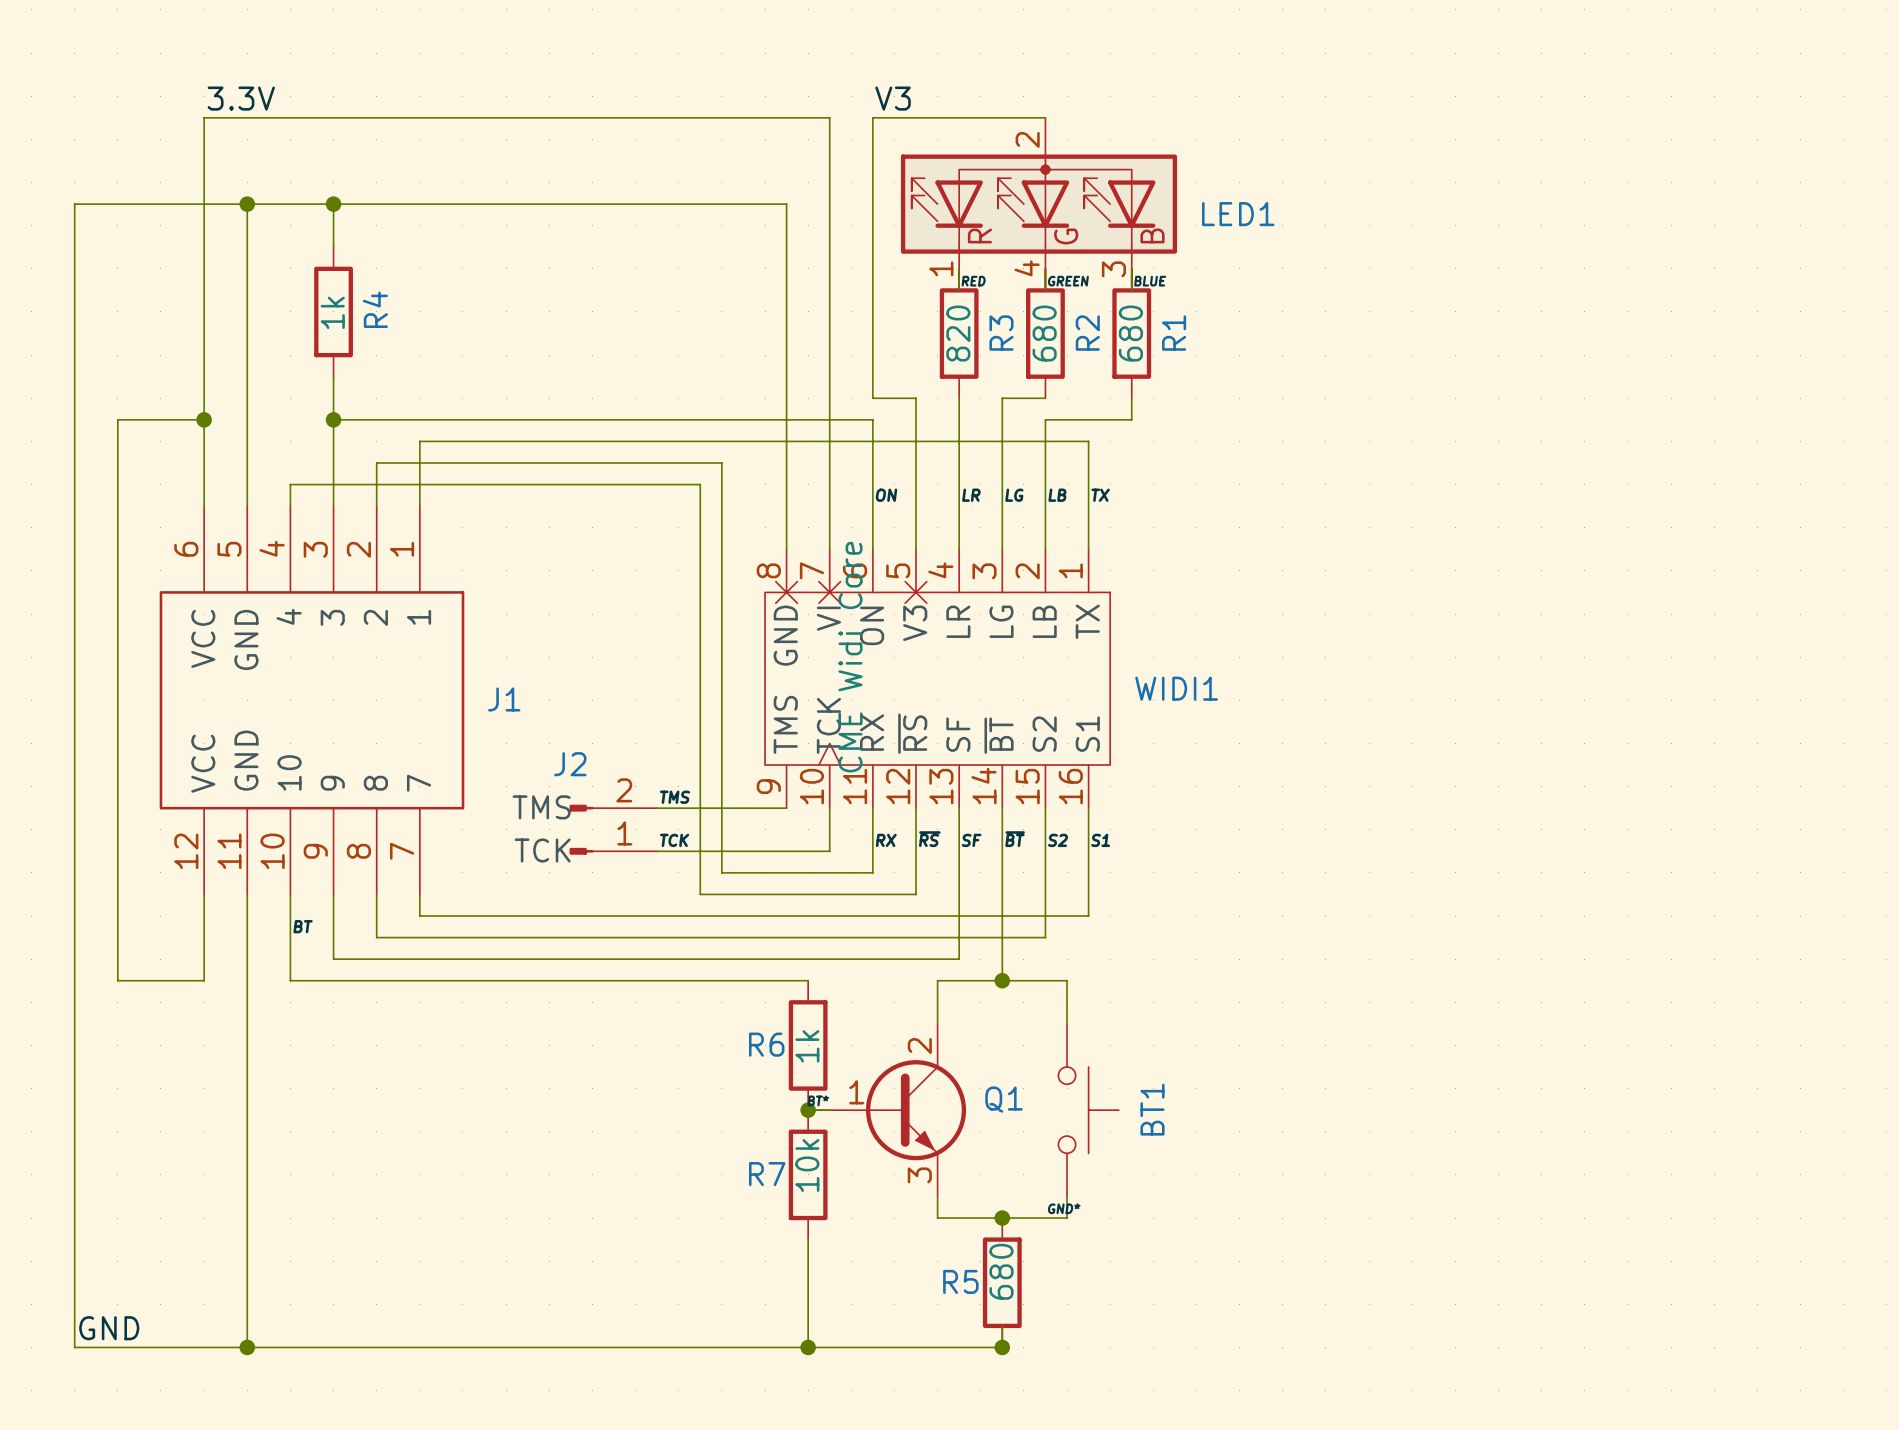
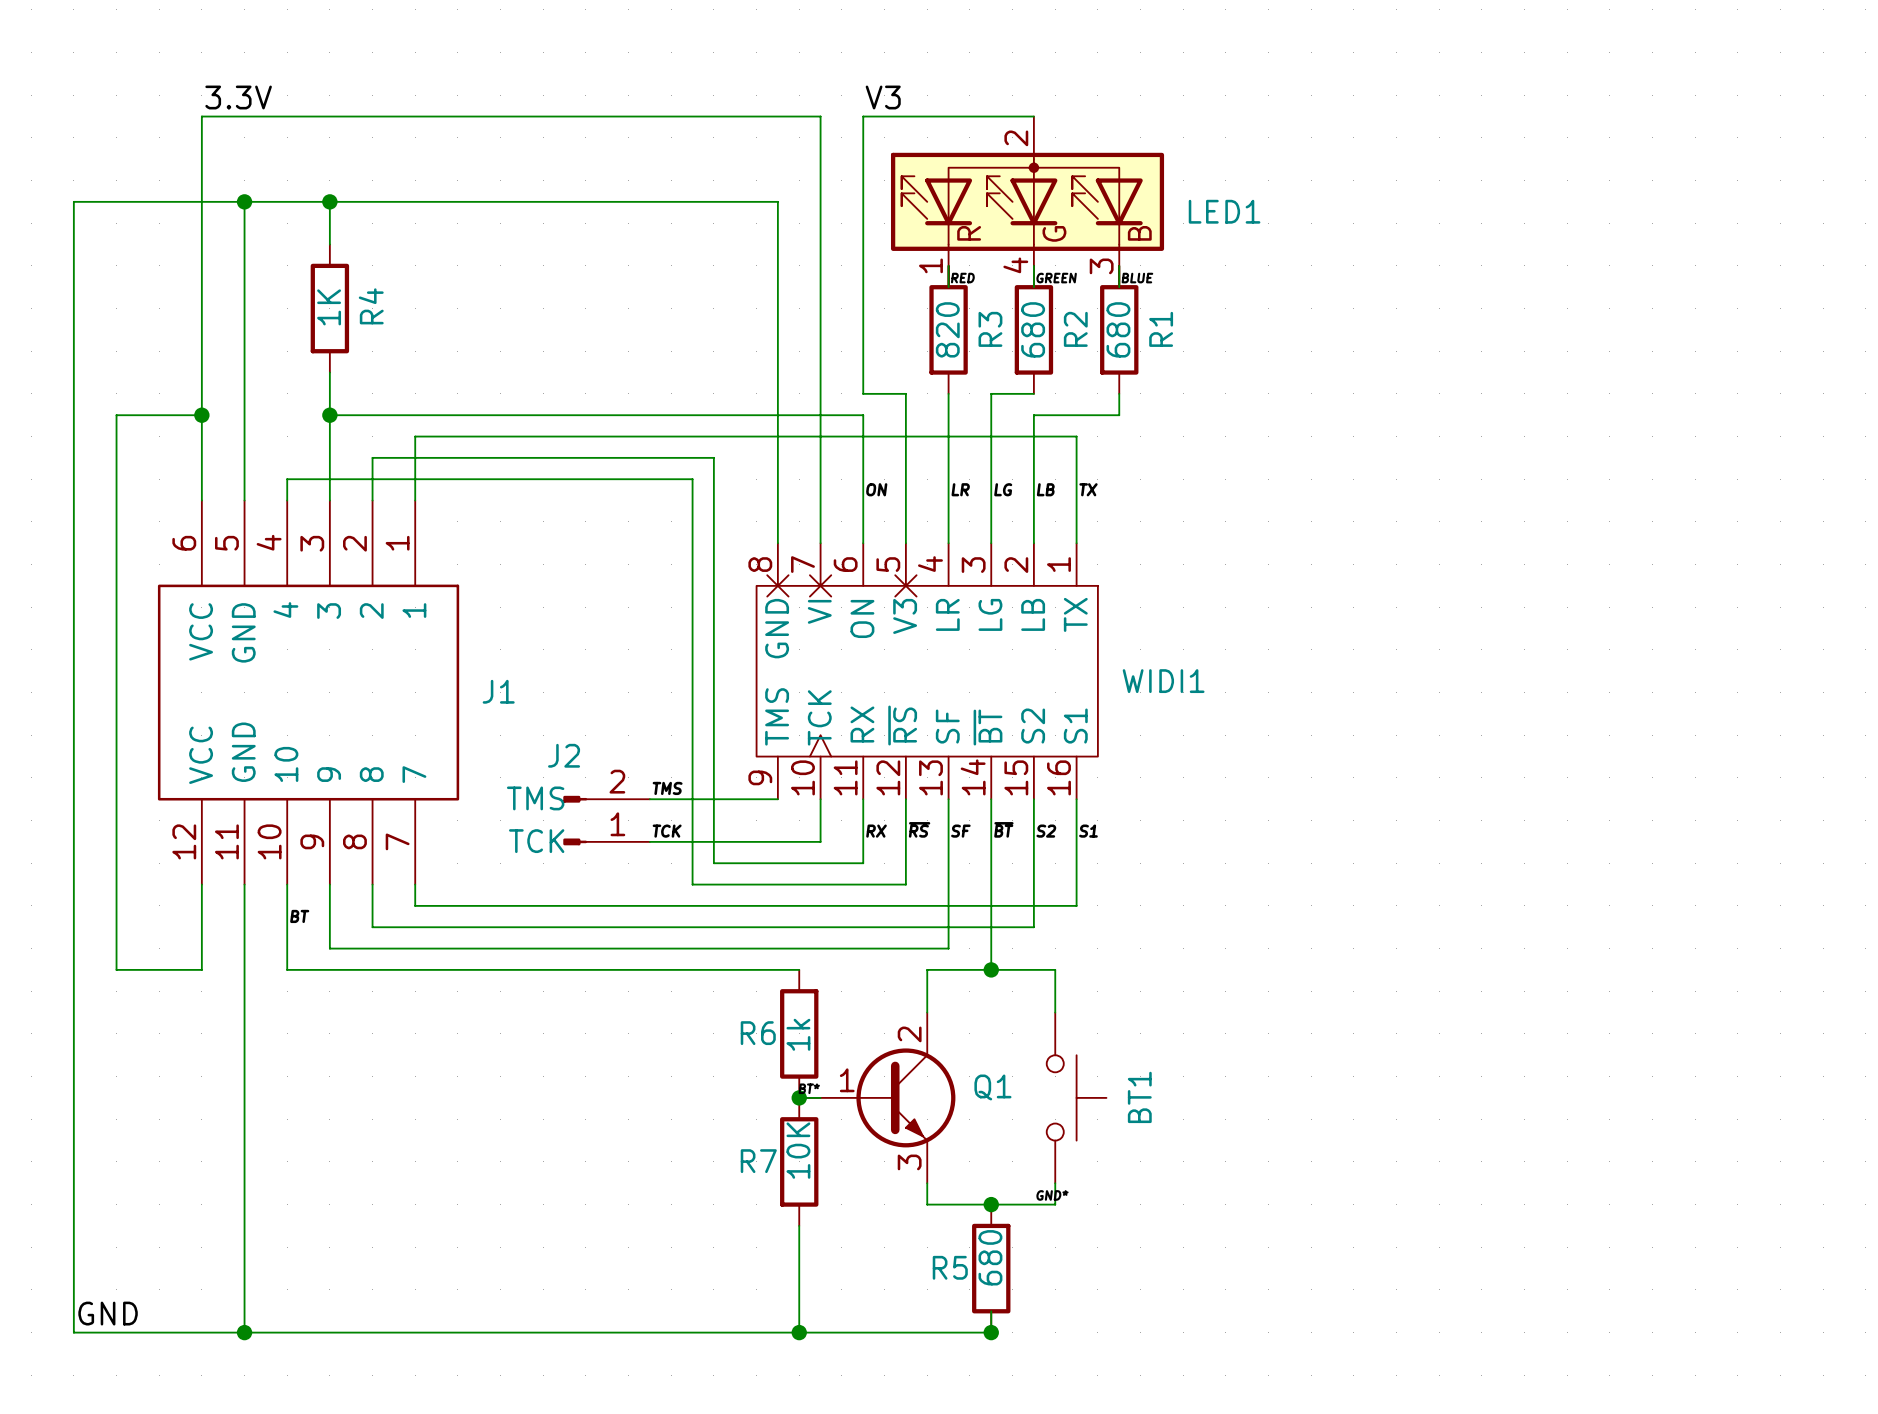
R4 value: 1k (332, 312) -> 1K (329, 307)
WIDI1 value: CME Widi Core (850, 657) -> none
R7 value: 10k (807, 1165) -> 10K (798, 1150)

